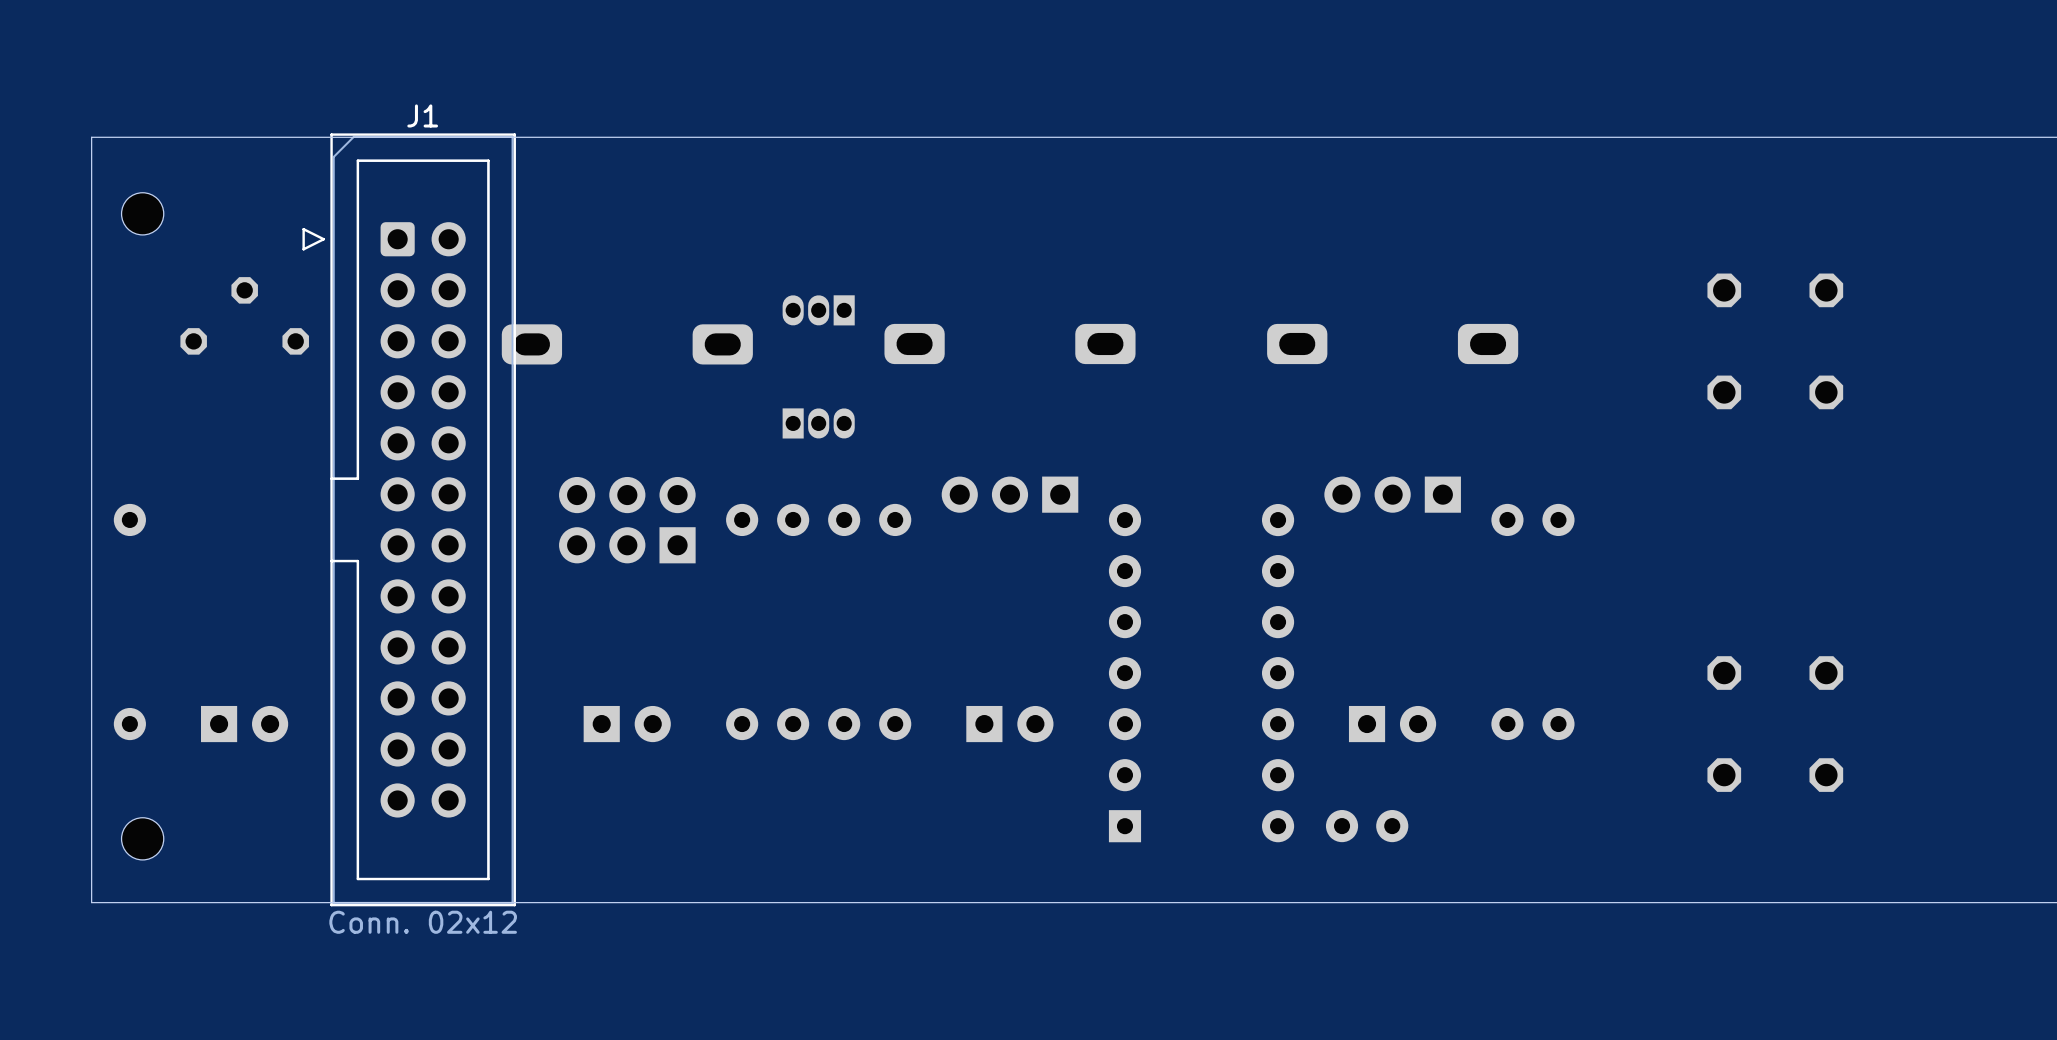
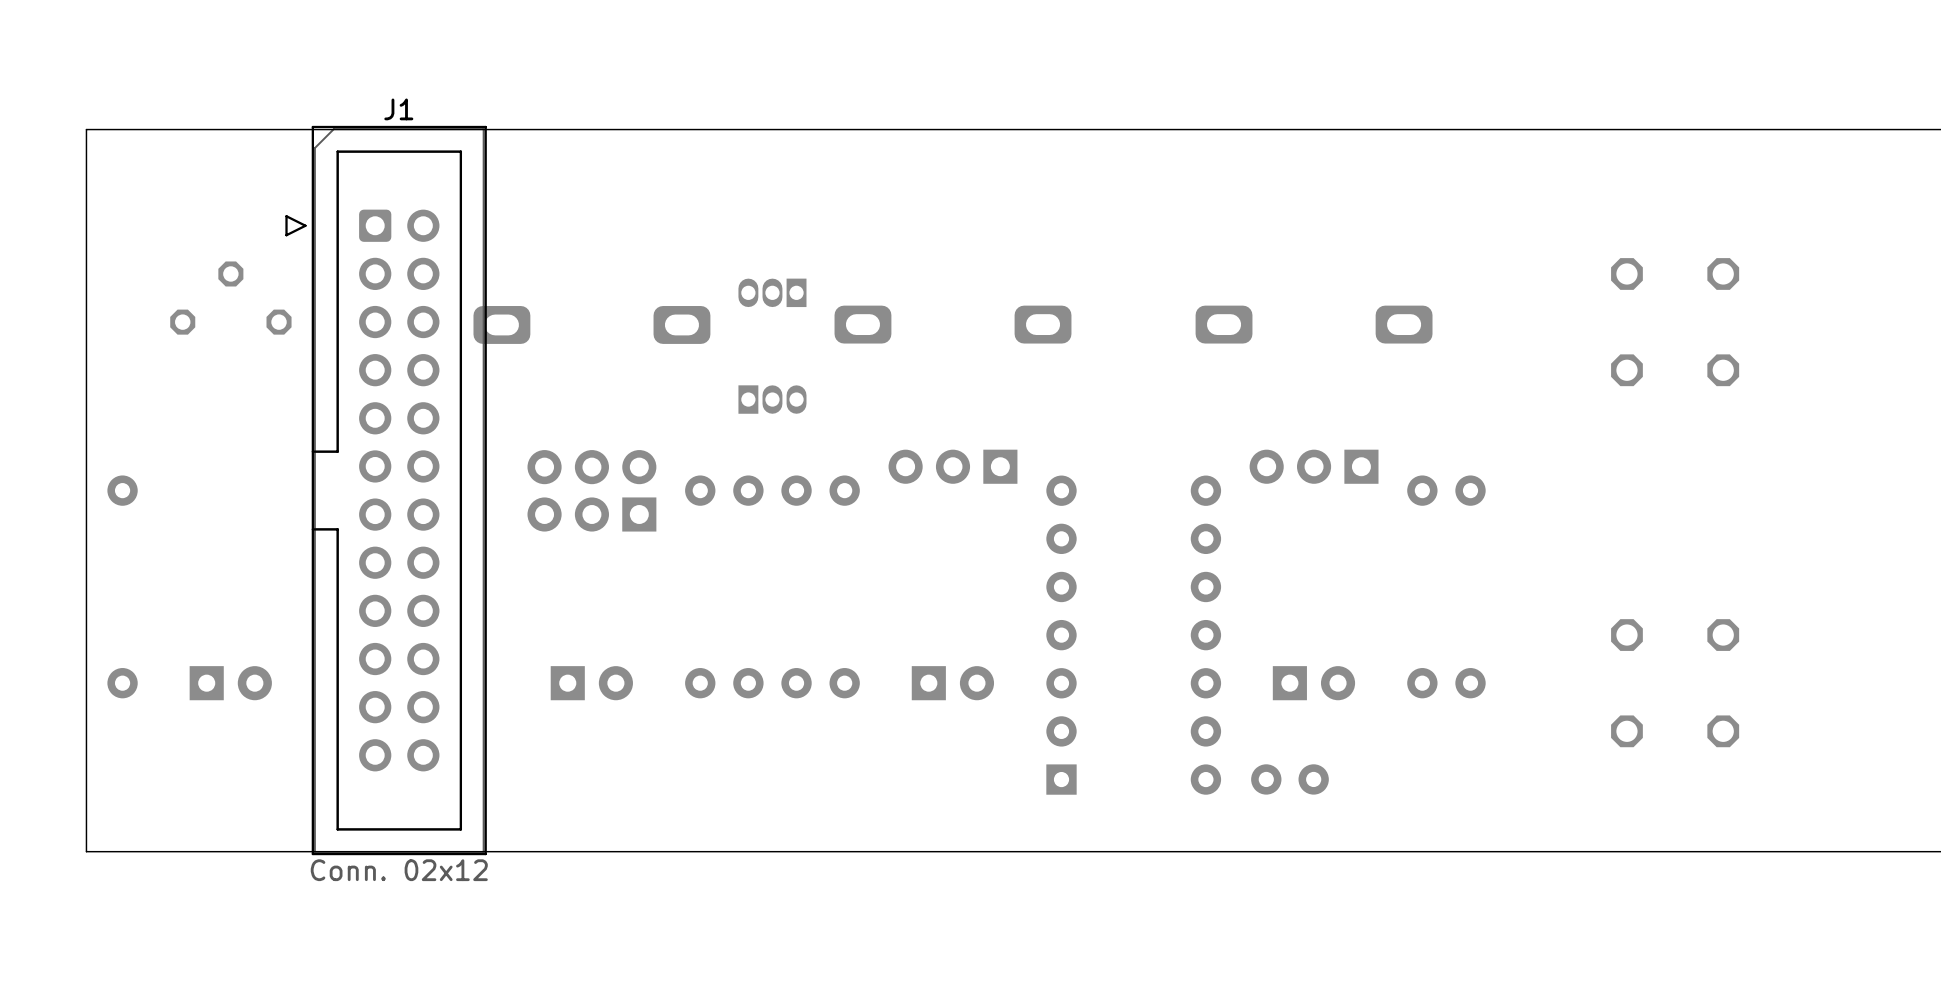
part: (142, 213) -> none
part: (142, 838) -> none

